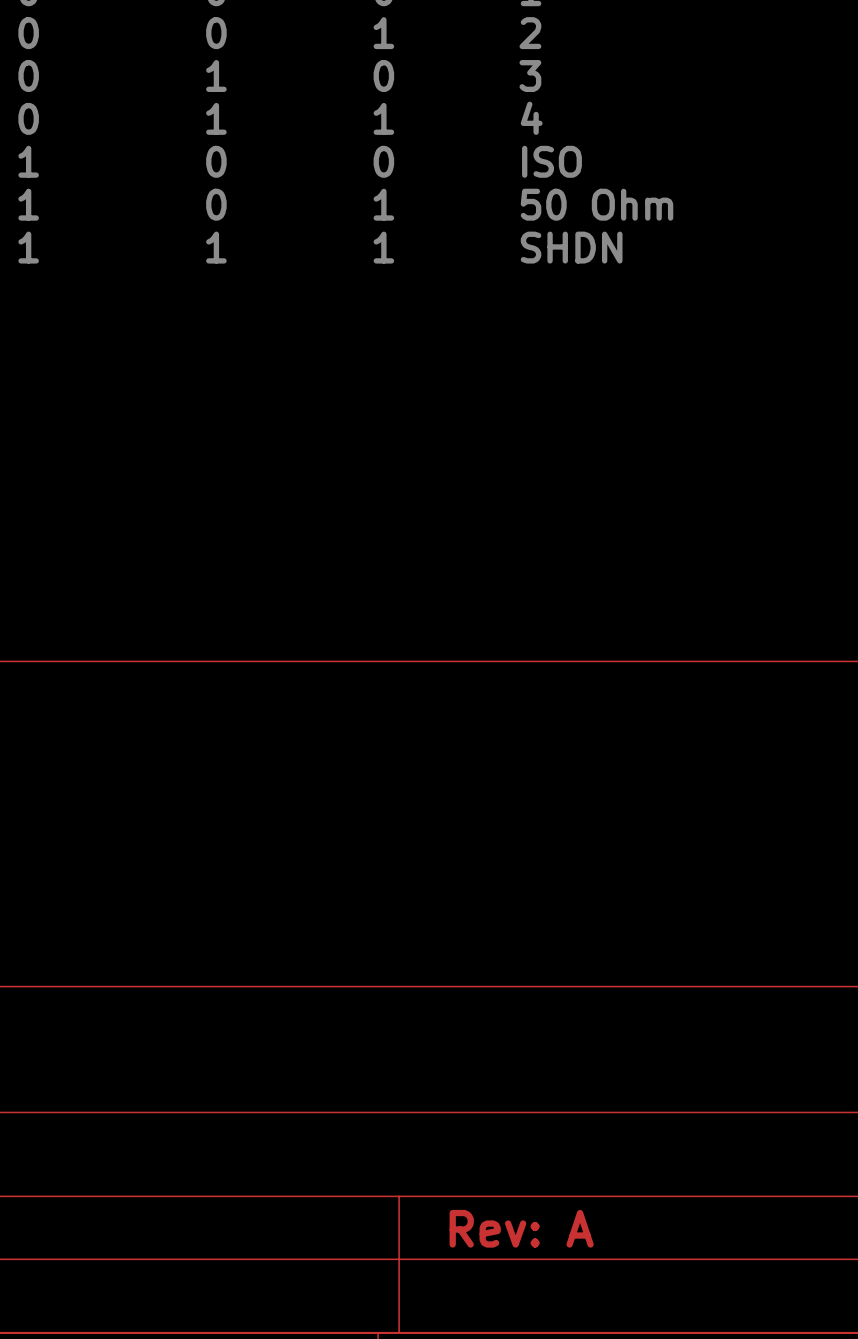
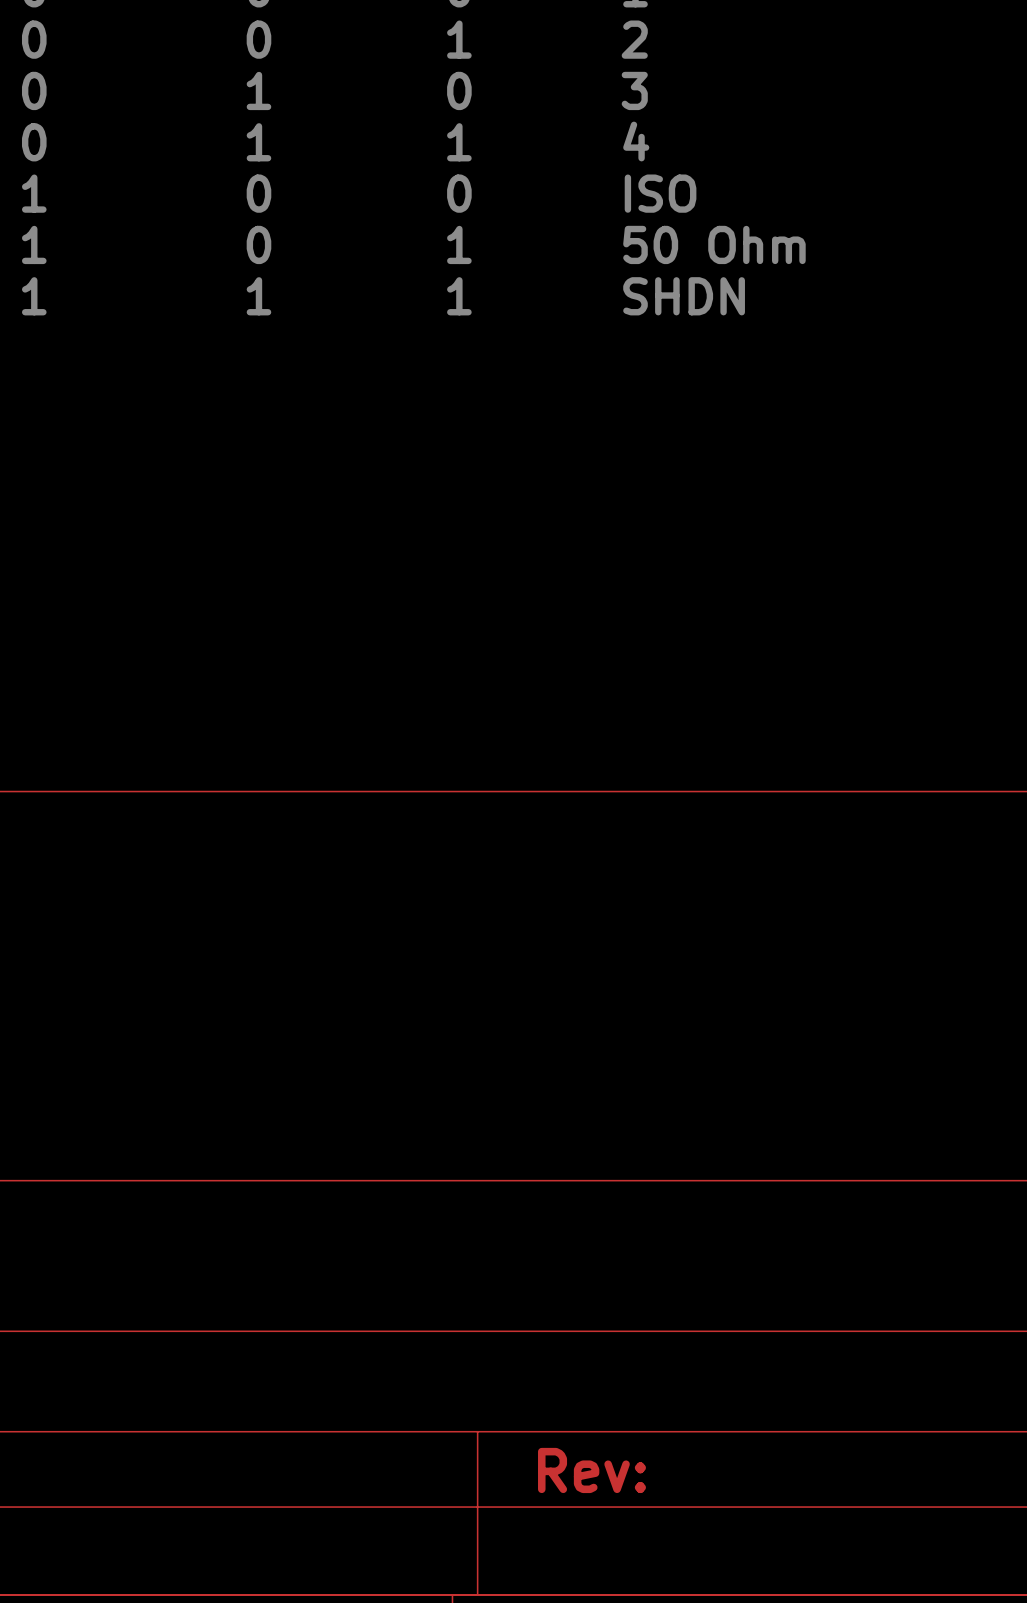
title block: Rev: A (521, 1228) -> Rev: (591, 1470)

